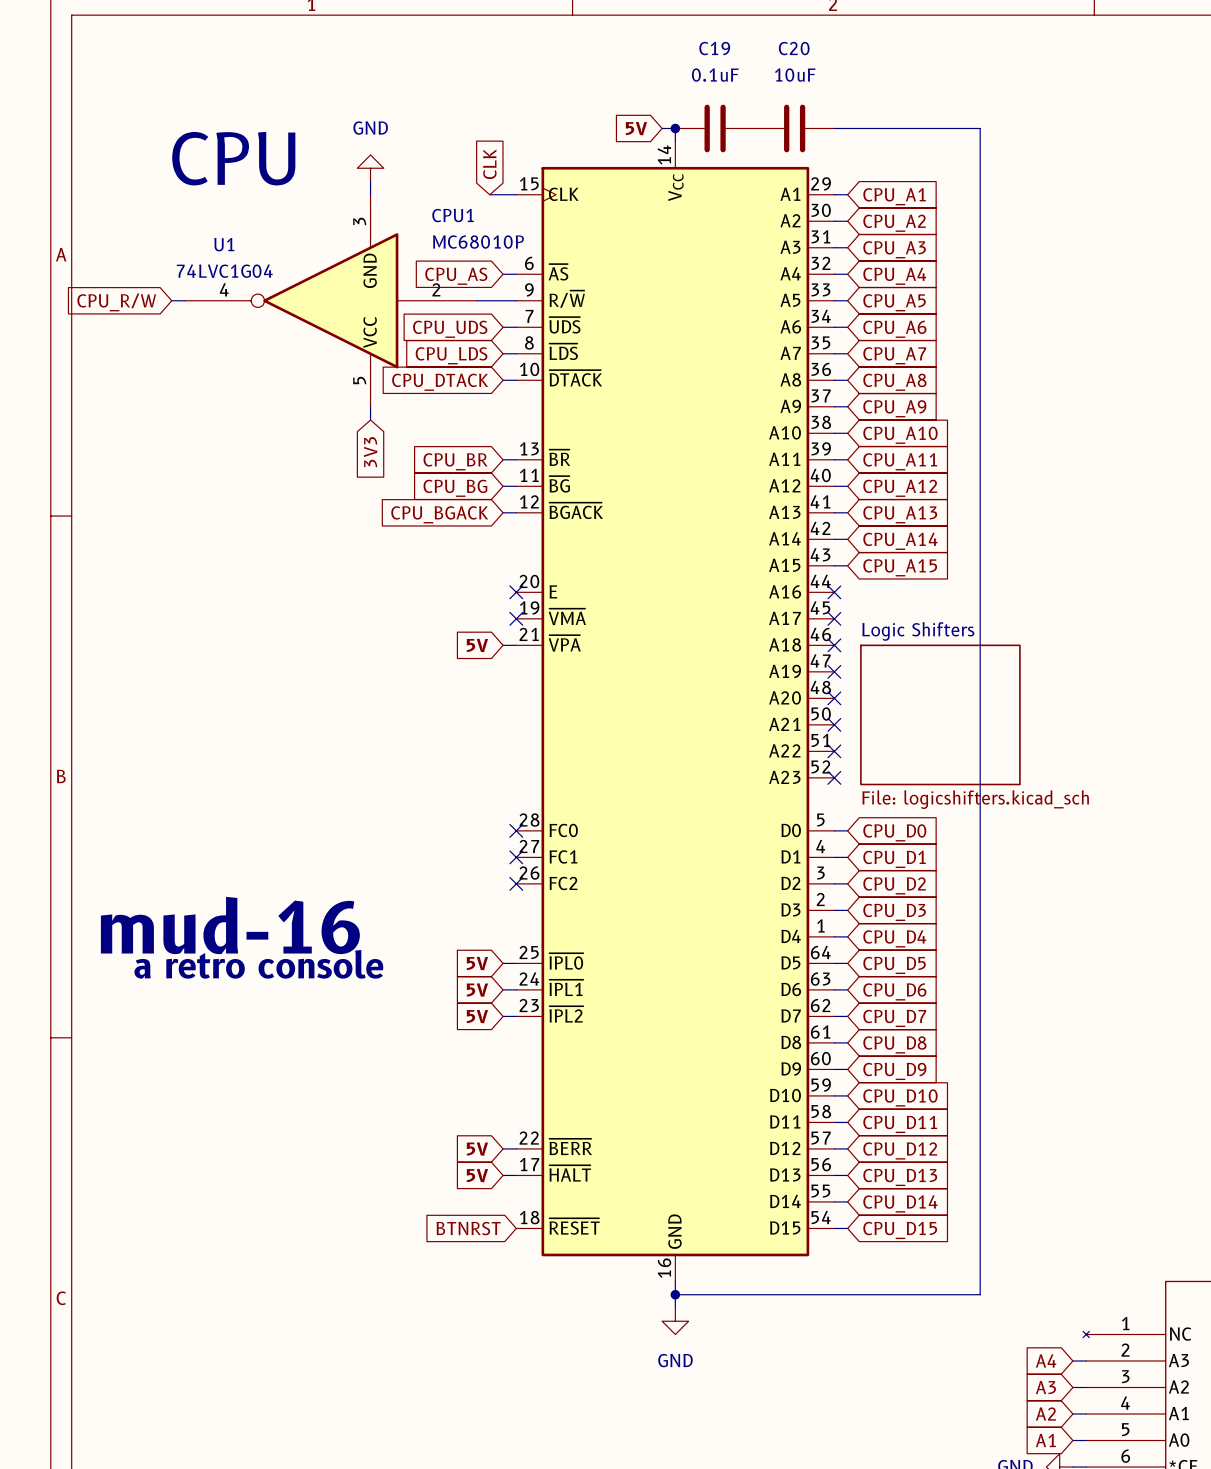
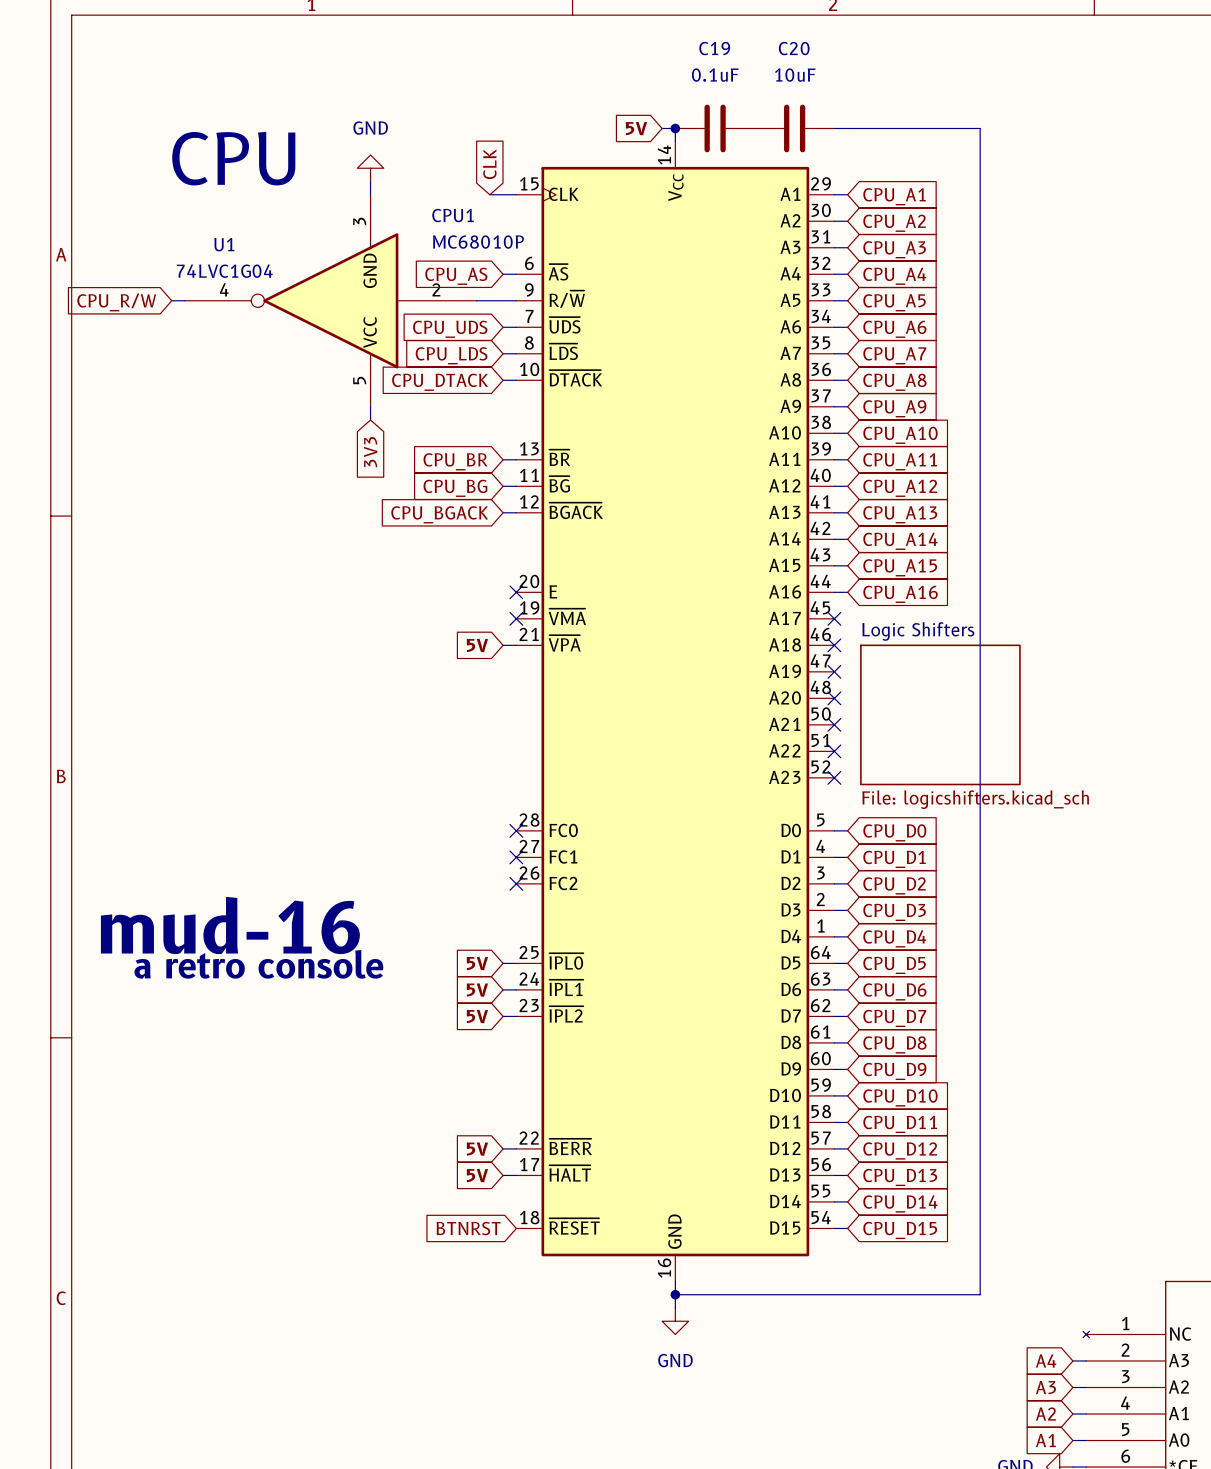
wire: none -> (834, 592) (847, 592)
no-connect mark: (834, 592) -> none
global label: none -> CPU_A16 (900, 594)

